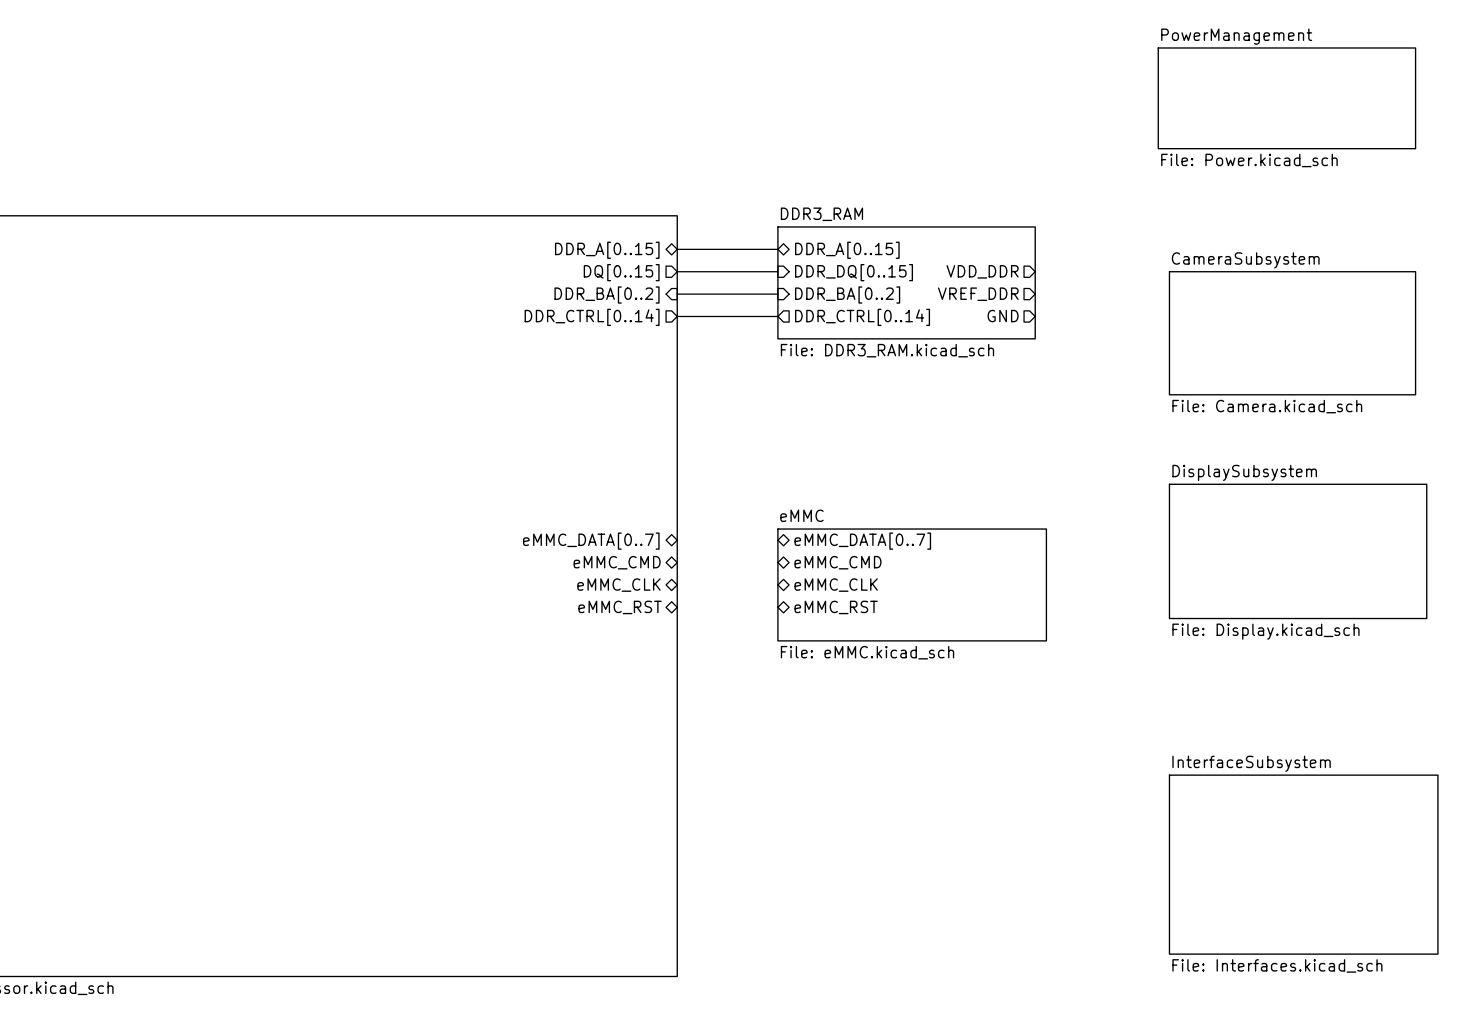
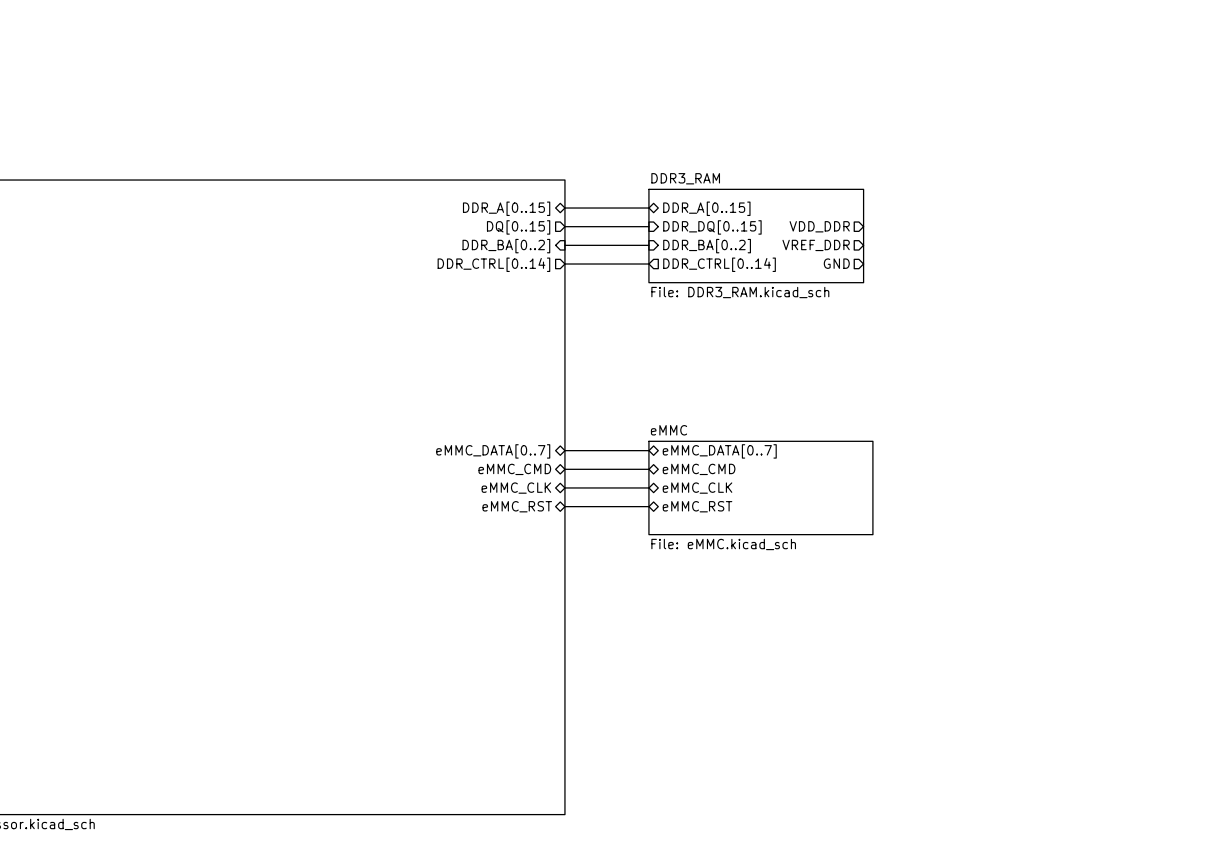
sheet PowerManagement: File: Power.kicad_sch (1286, 98) -> none
sheet CameraSubsystem: File: Camera.kicad_sch (1292, 333) -> none
wire: none -> (564, 450) (648, 450)
sheet DisplaySubsystem: File: Display.kicad_sch (1298, 551) -> none
wire: none -> (564, 469) (648, 469)
wire: none -> (564, 487) (648, 487)
wire: none -> (564, 506) (648, 506)
sheet InterfaceSubsystem: File: Interfaces.kicad_sch (1303, 864) -> none

